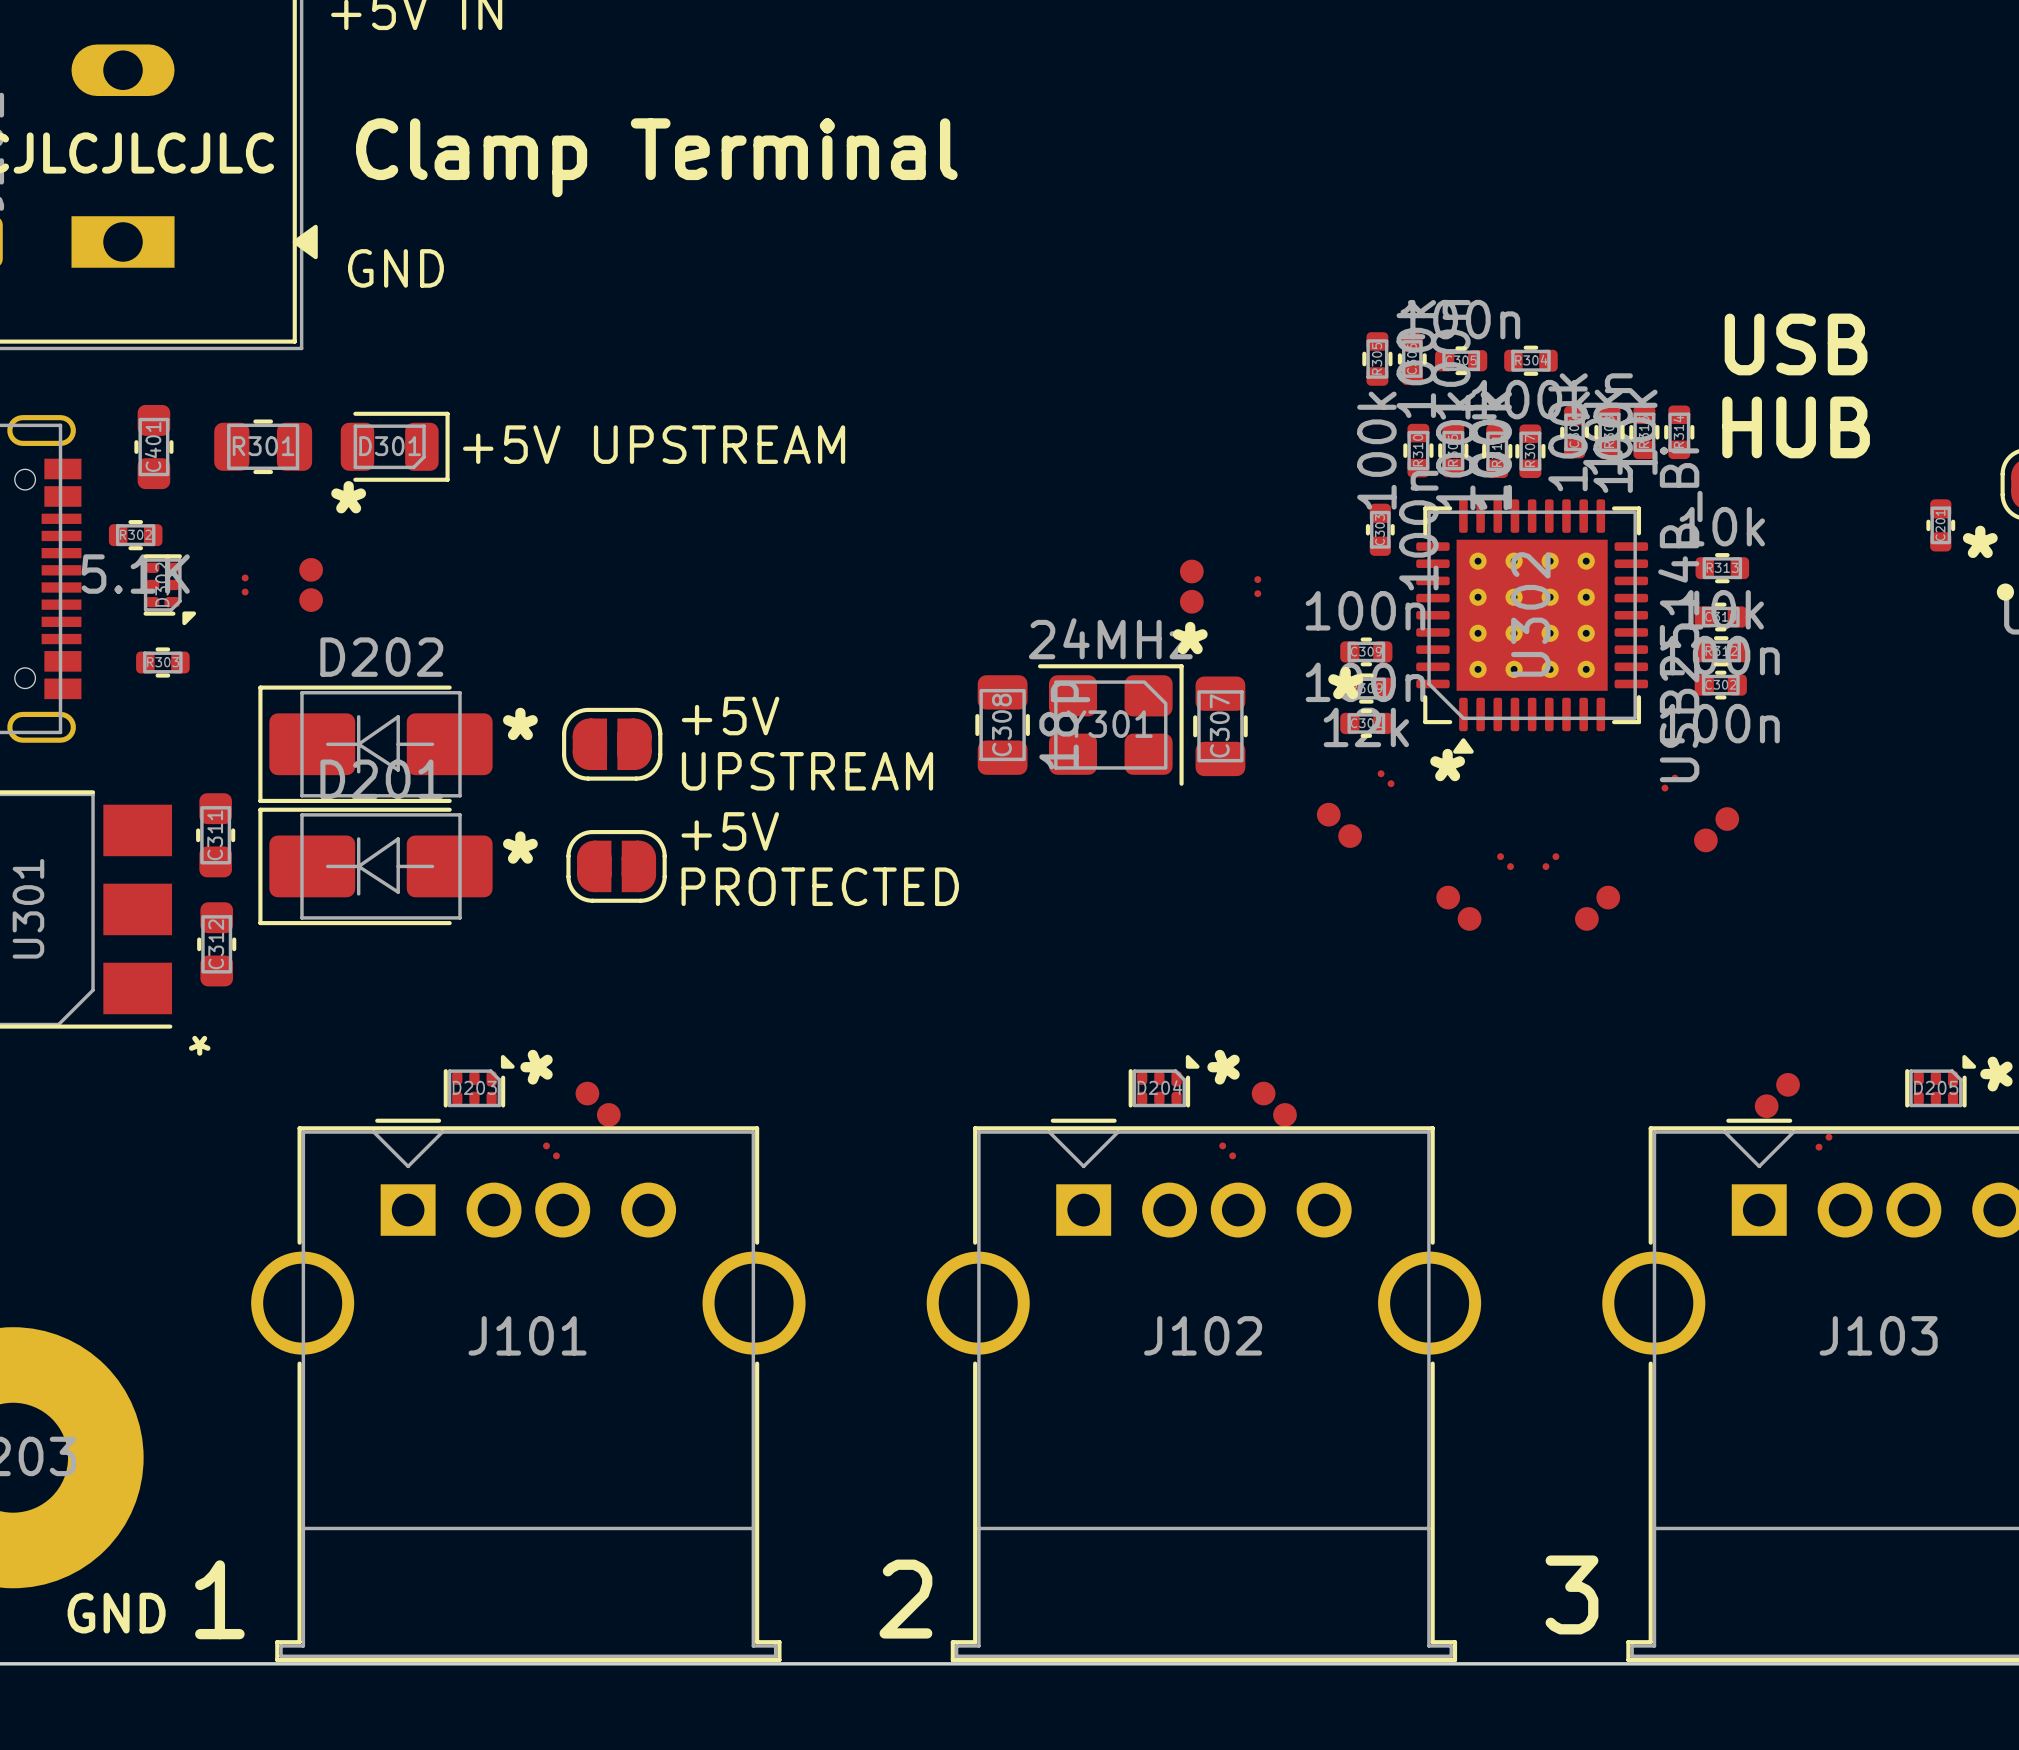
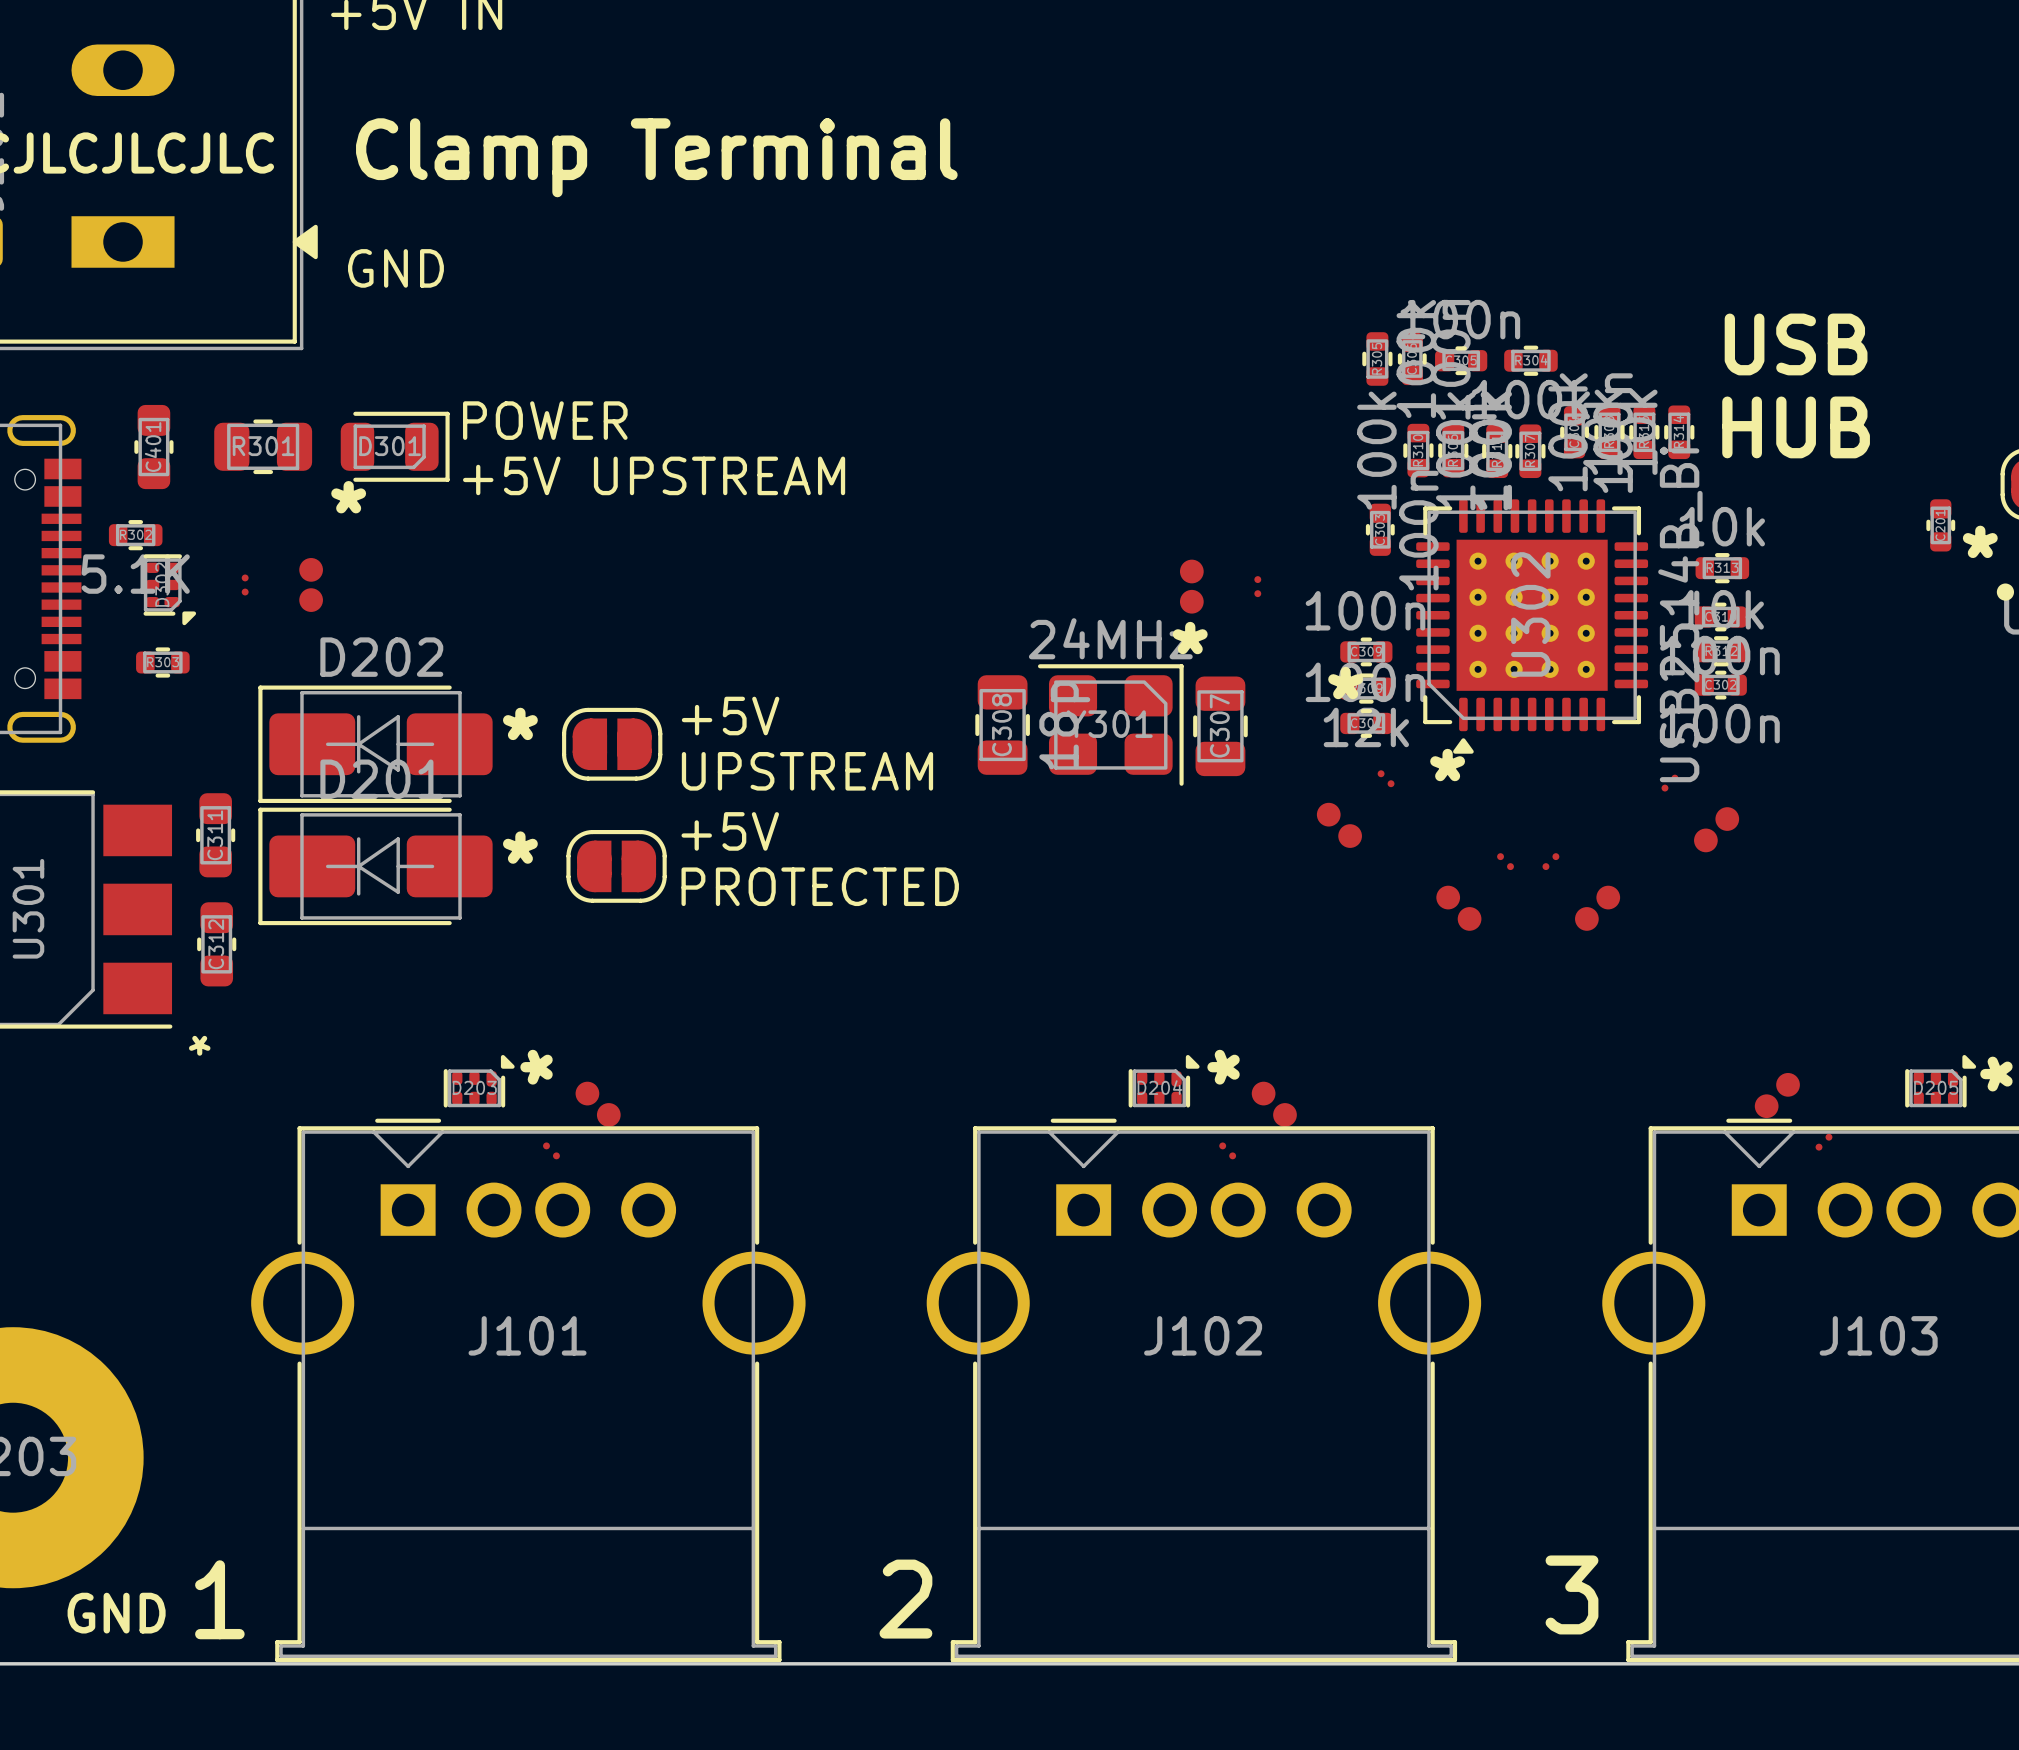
text: none -> POWER (545, 420)
text position: +5V UPSTREAM (654, 444) -> +5V UPSTREAM (654, 475)

